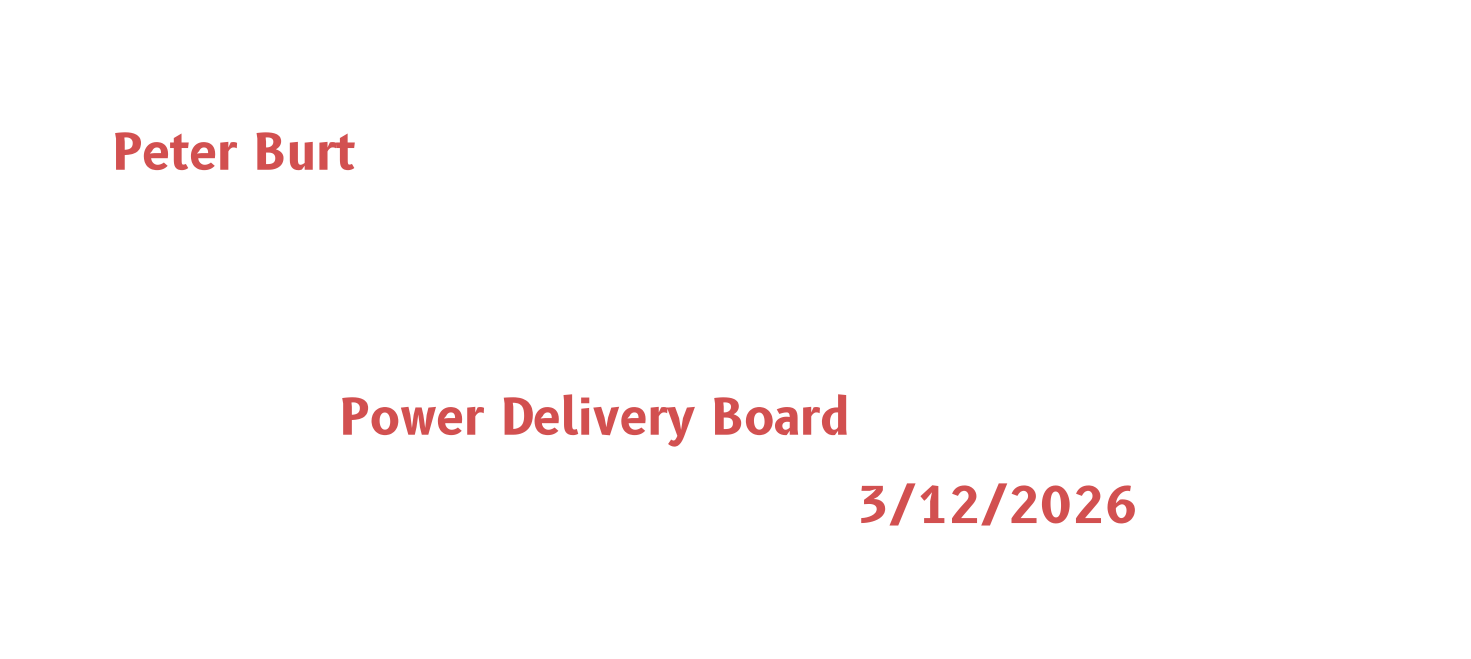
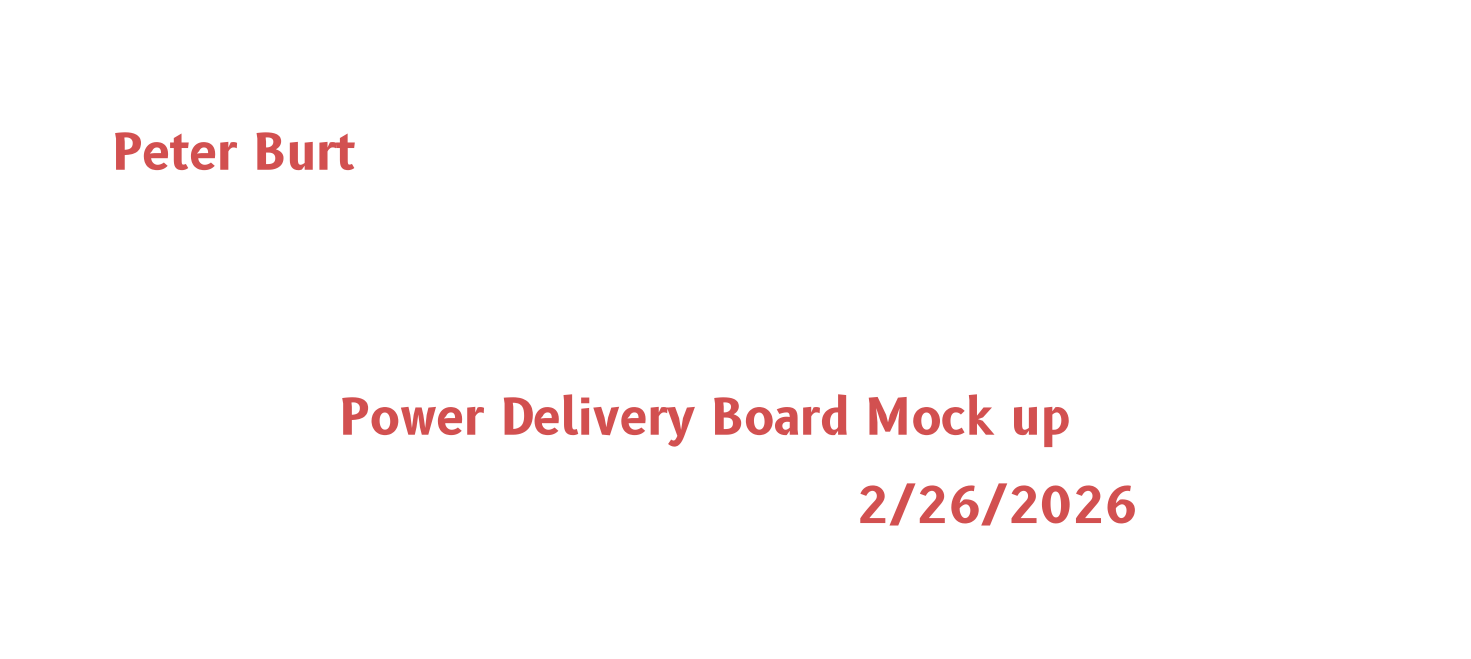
text: Power Delivery Board (594, 420) -> Power Delivery Board Mock up (705, 420)
text: 3/12/2026 (998, 504) -> 2/26/2026 (997, 504)

